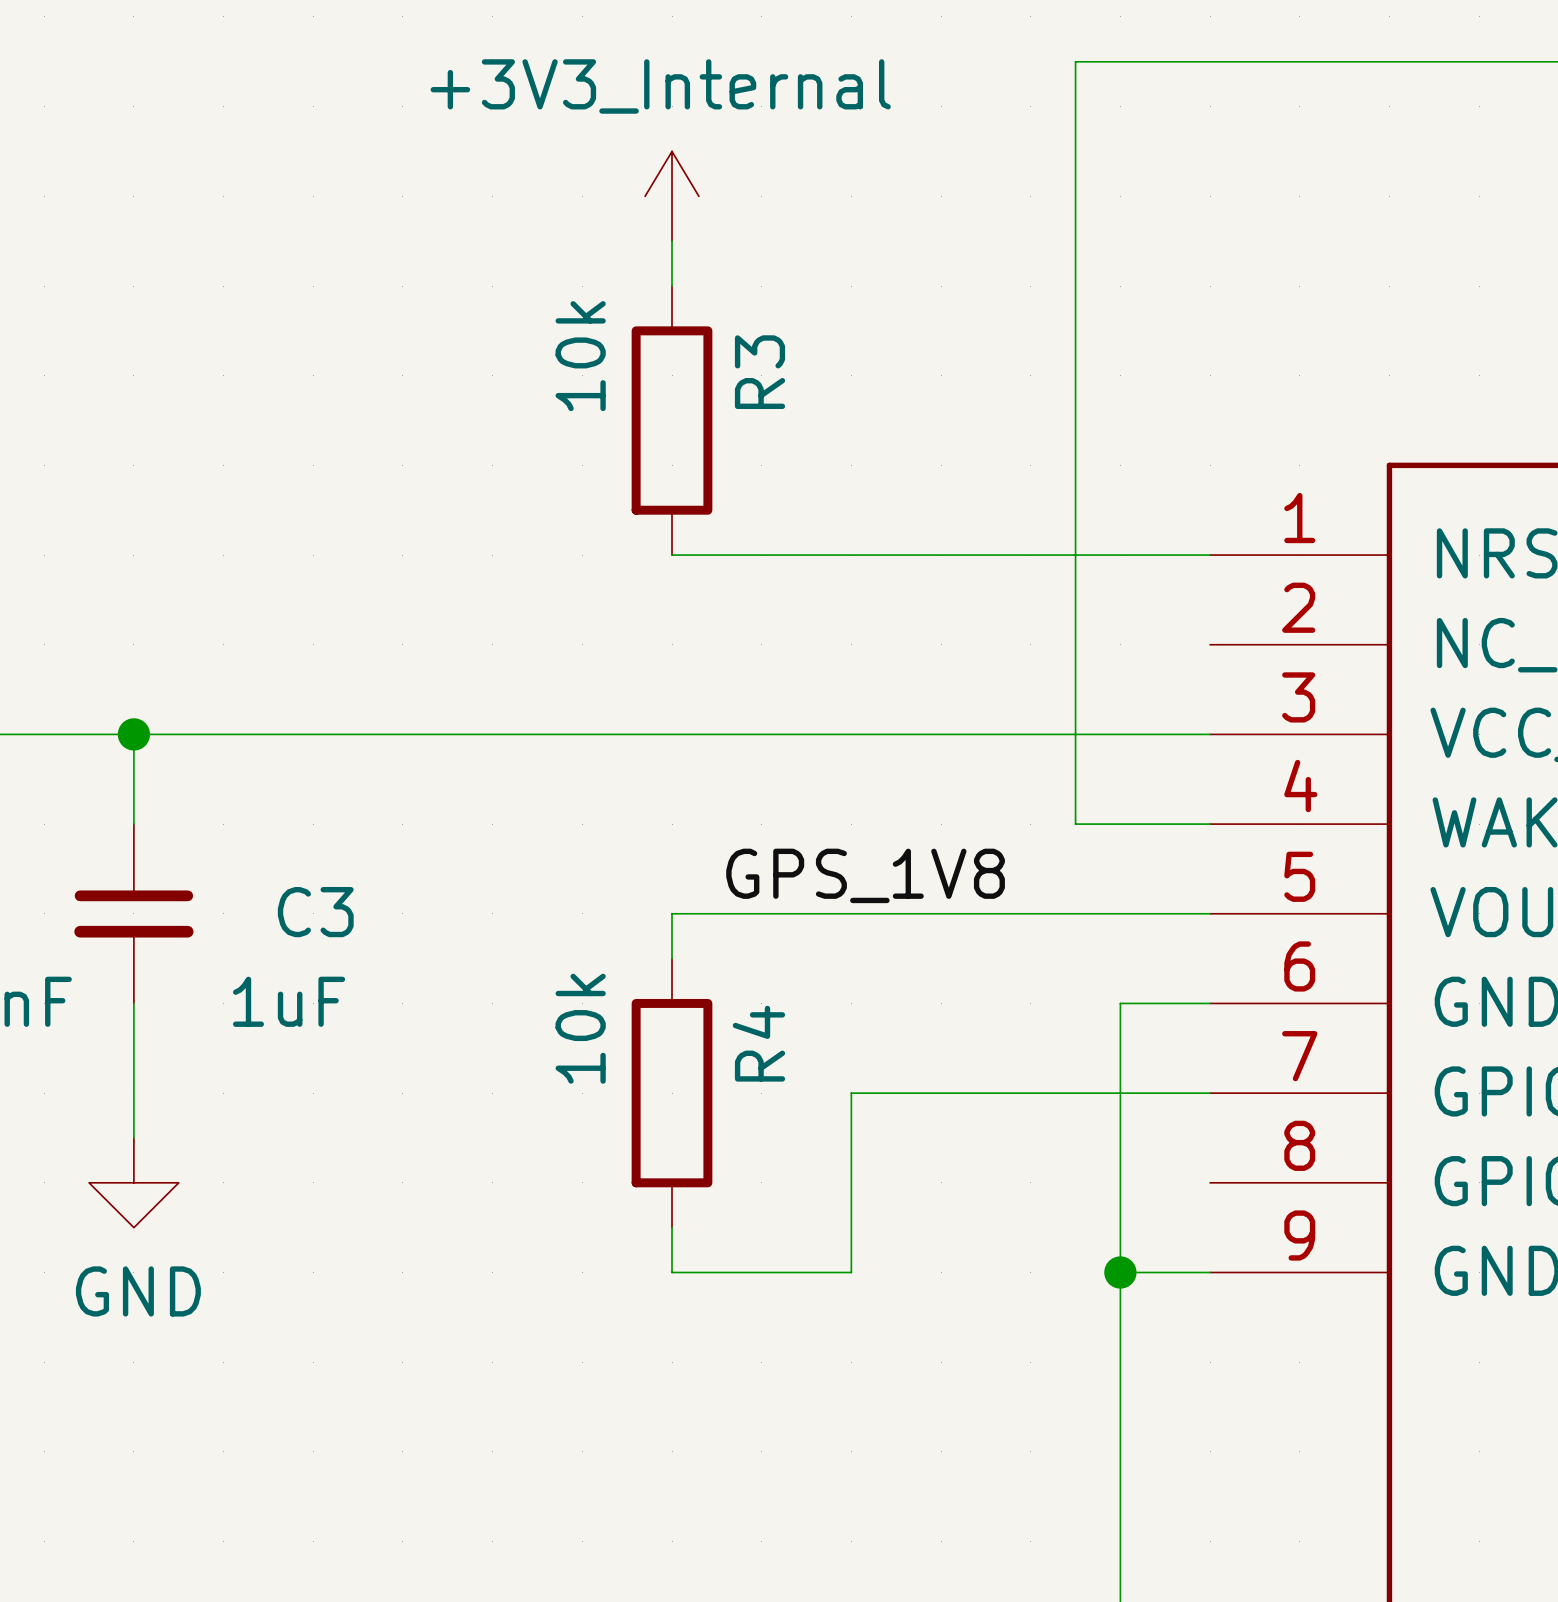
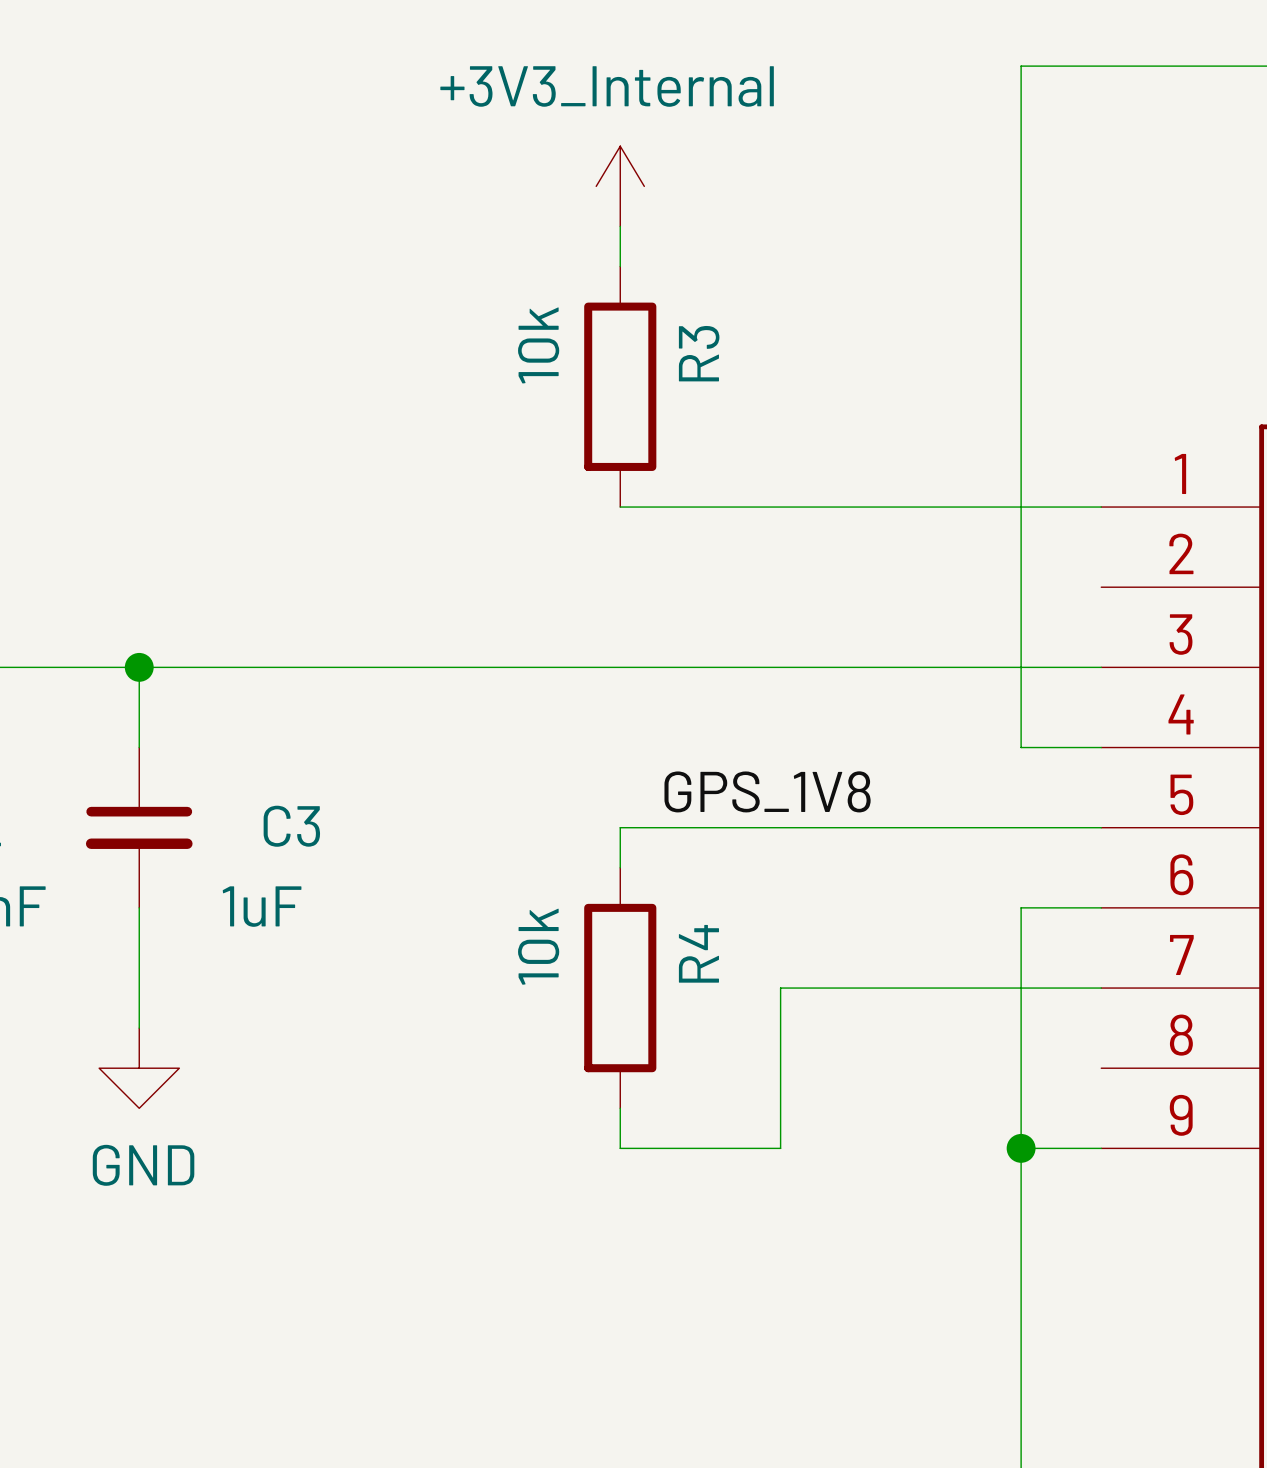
wire: (1120, 61) (1075, 61) (1075, 824) (1120, 824) -> (1021, 66) (1021, 747)

